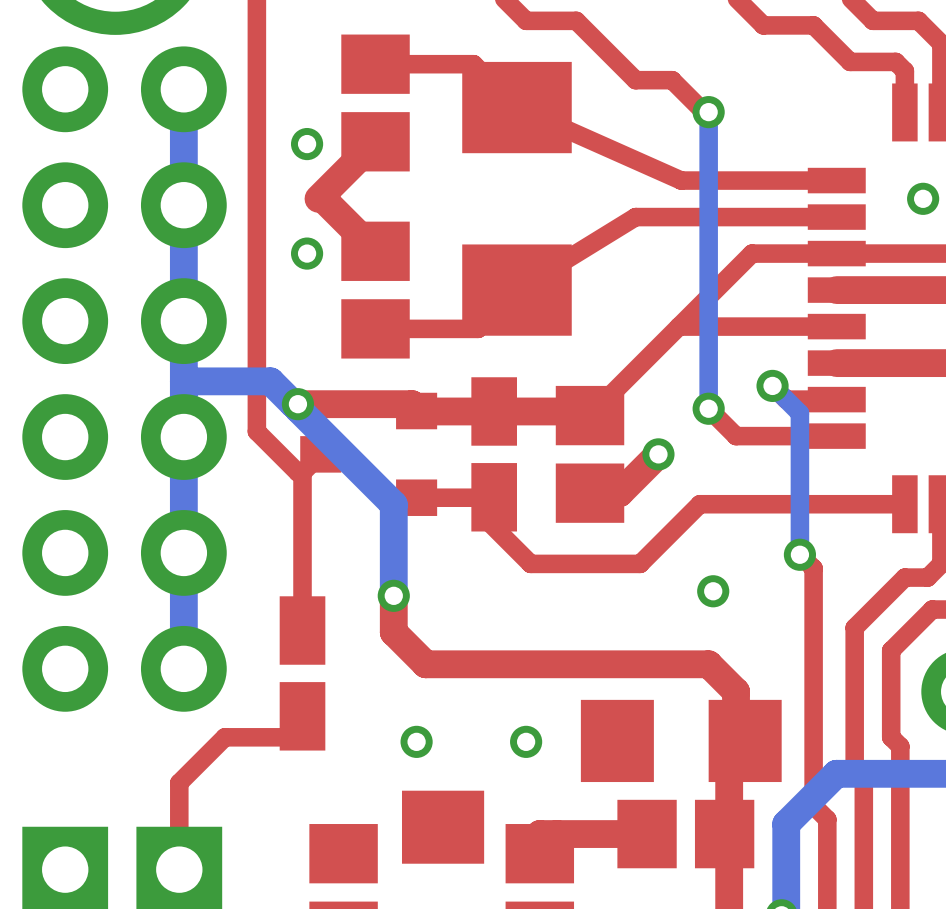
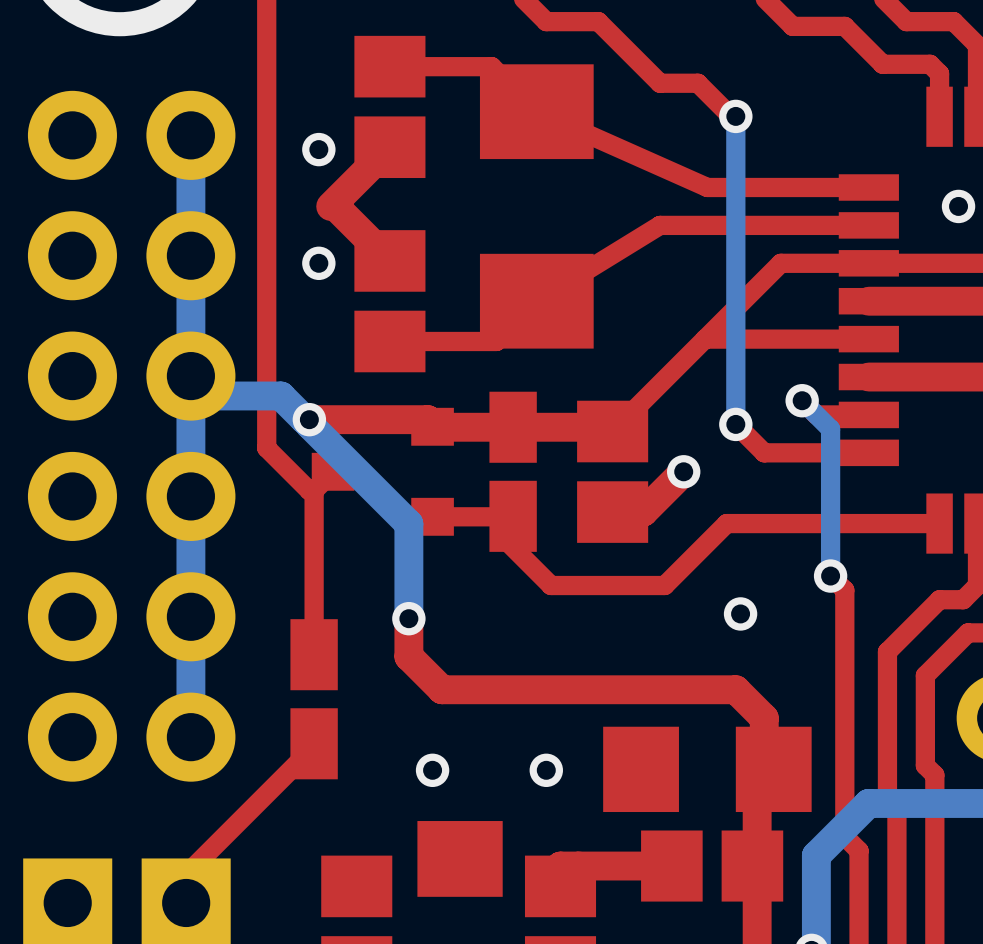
part position: (65, 379) -> (72, 436)
part position: (183, 379) -> (190, 436)
top track: (284, 737) (224, 737) (179, 782) (179, 842) -> (295, 765) (186, 874)

